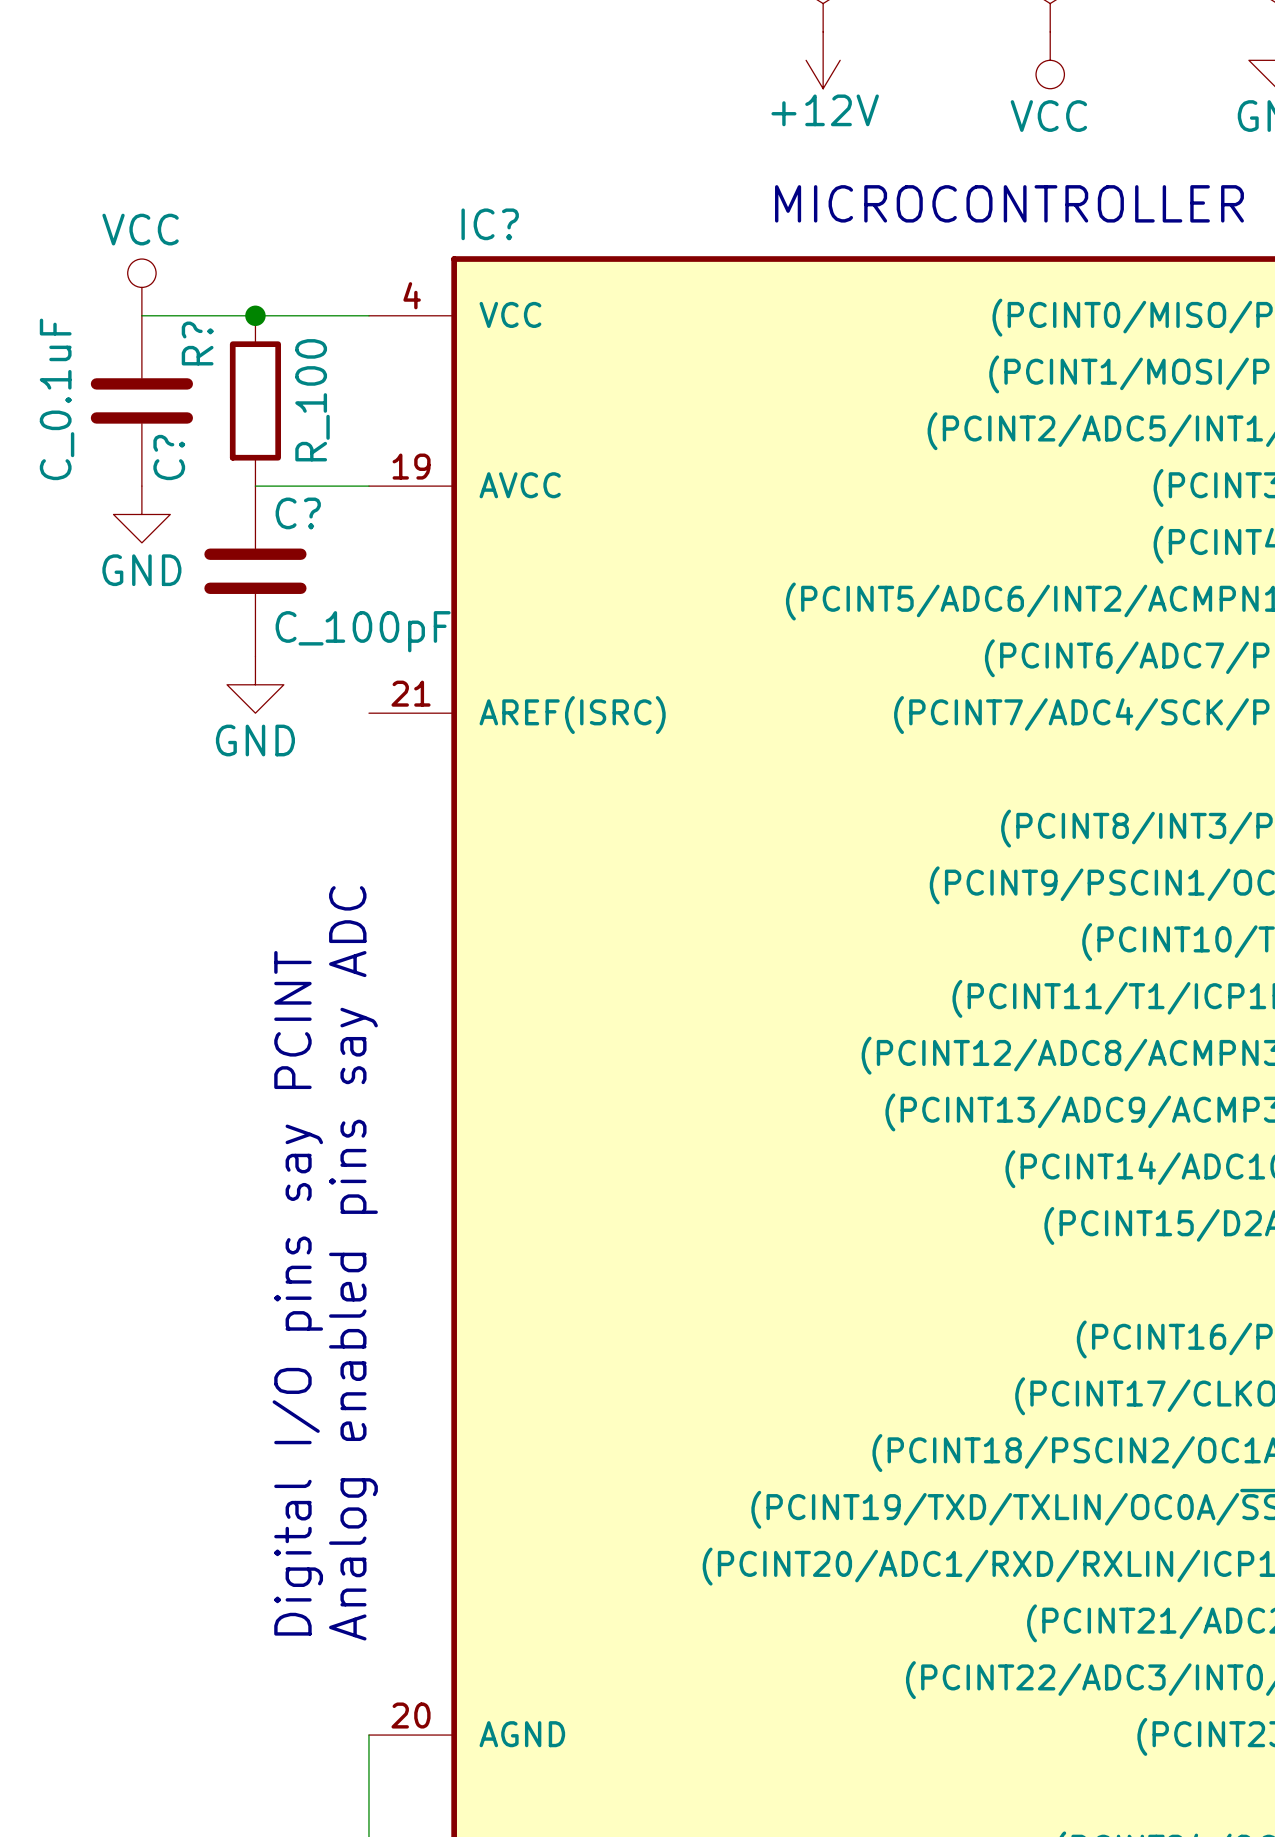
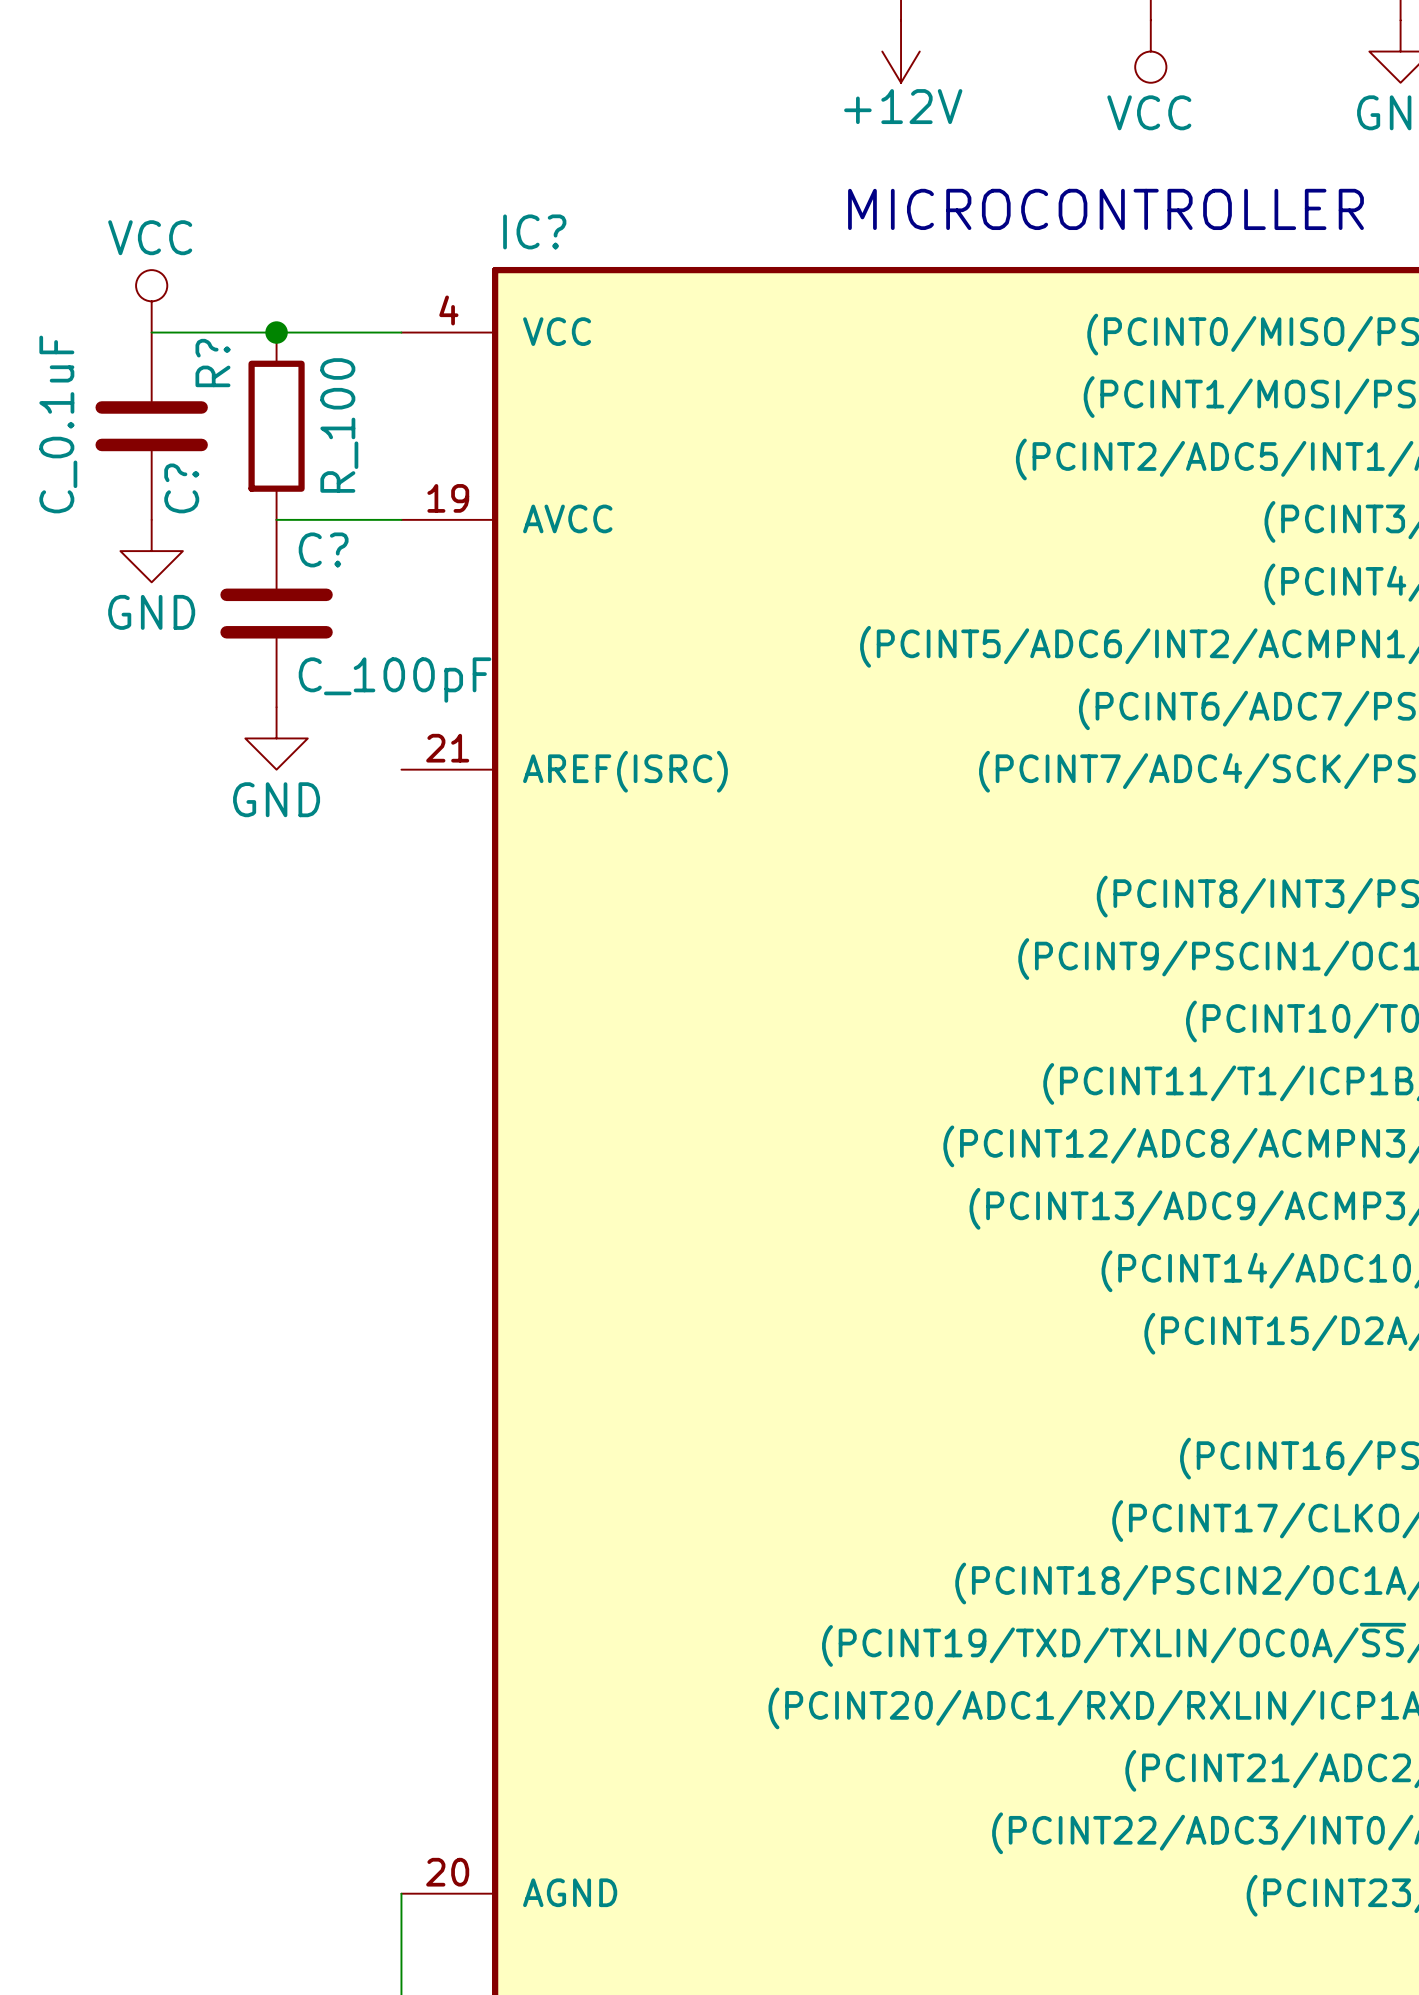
text: Analog enabled pins say ADC (353, 1263) -> none
text: Digital I/O pins say PCINT (297, 1293) -> none

